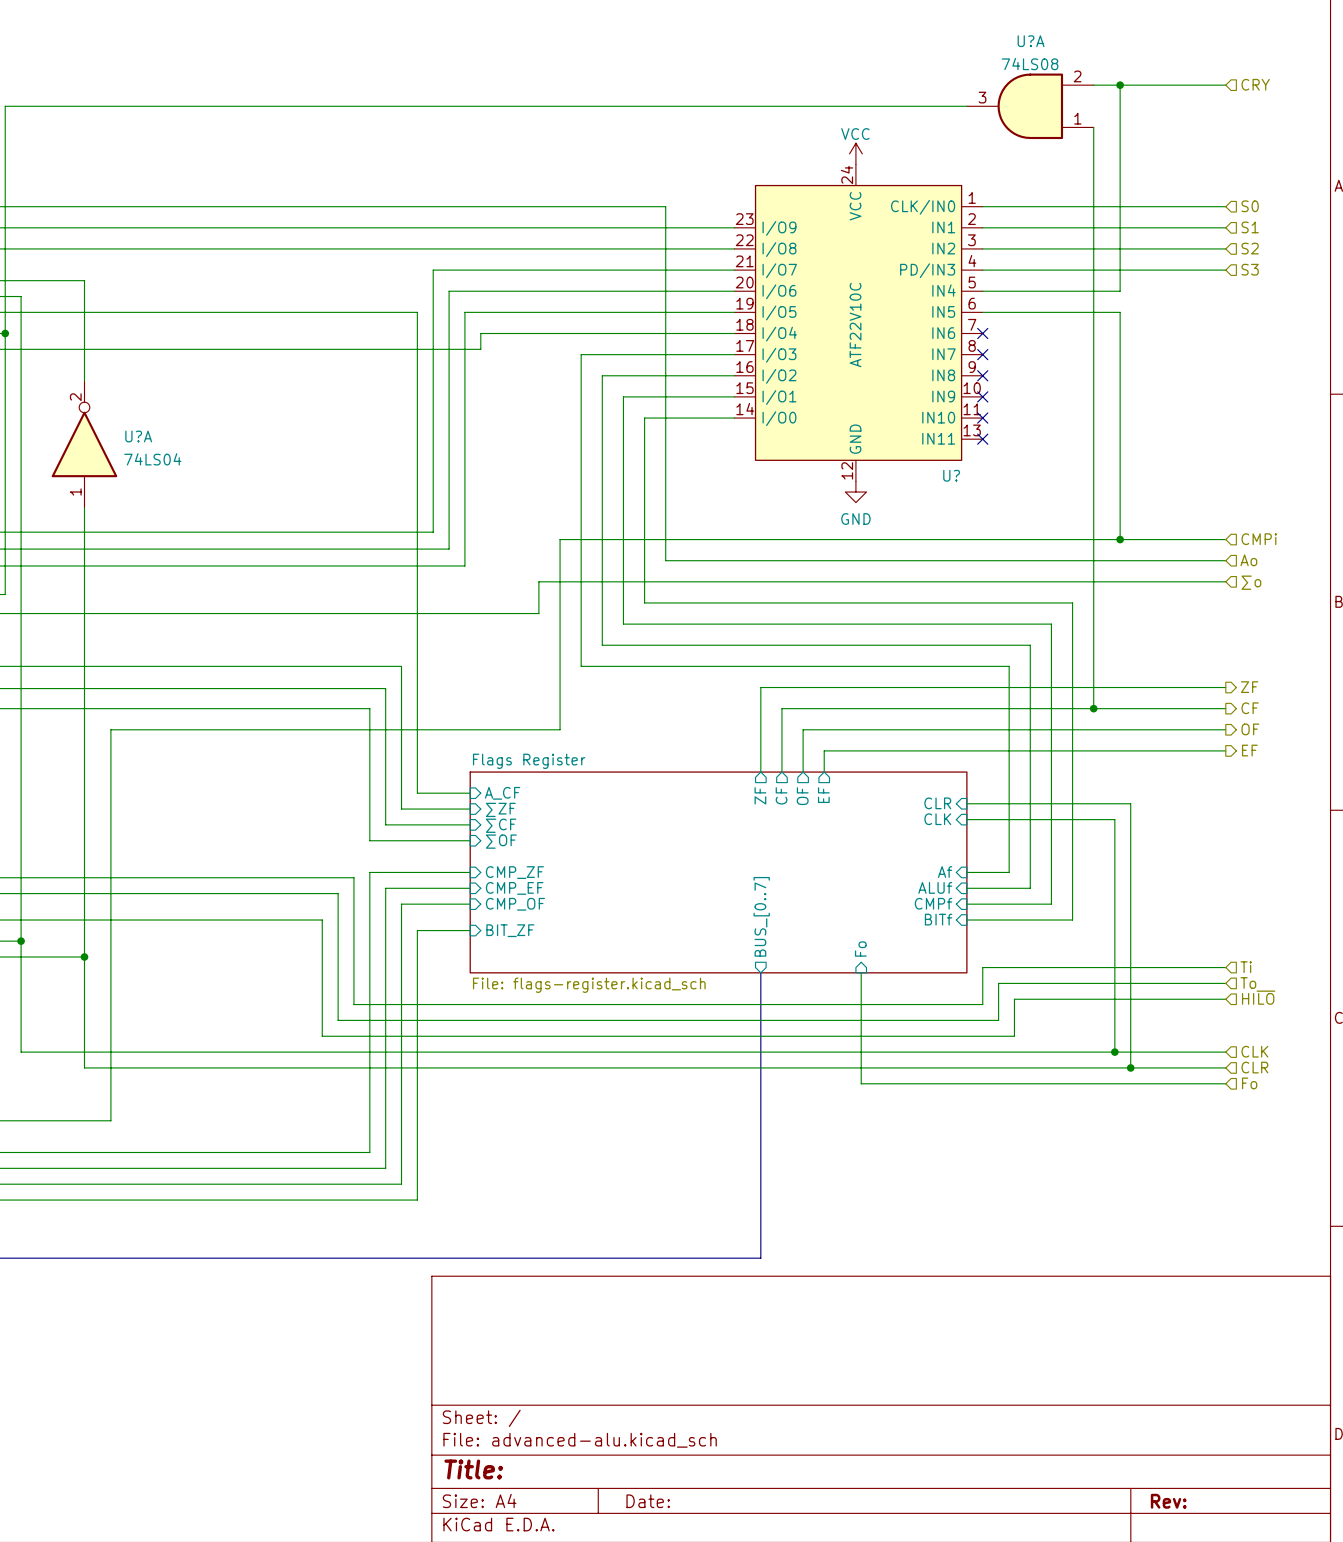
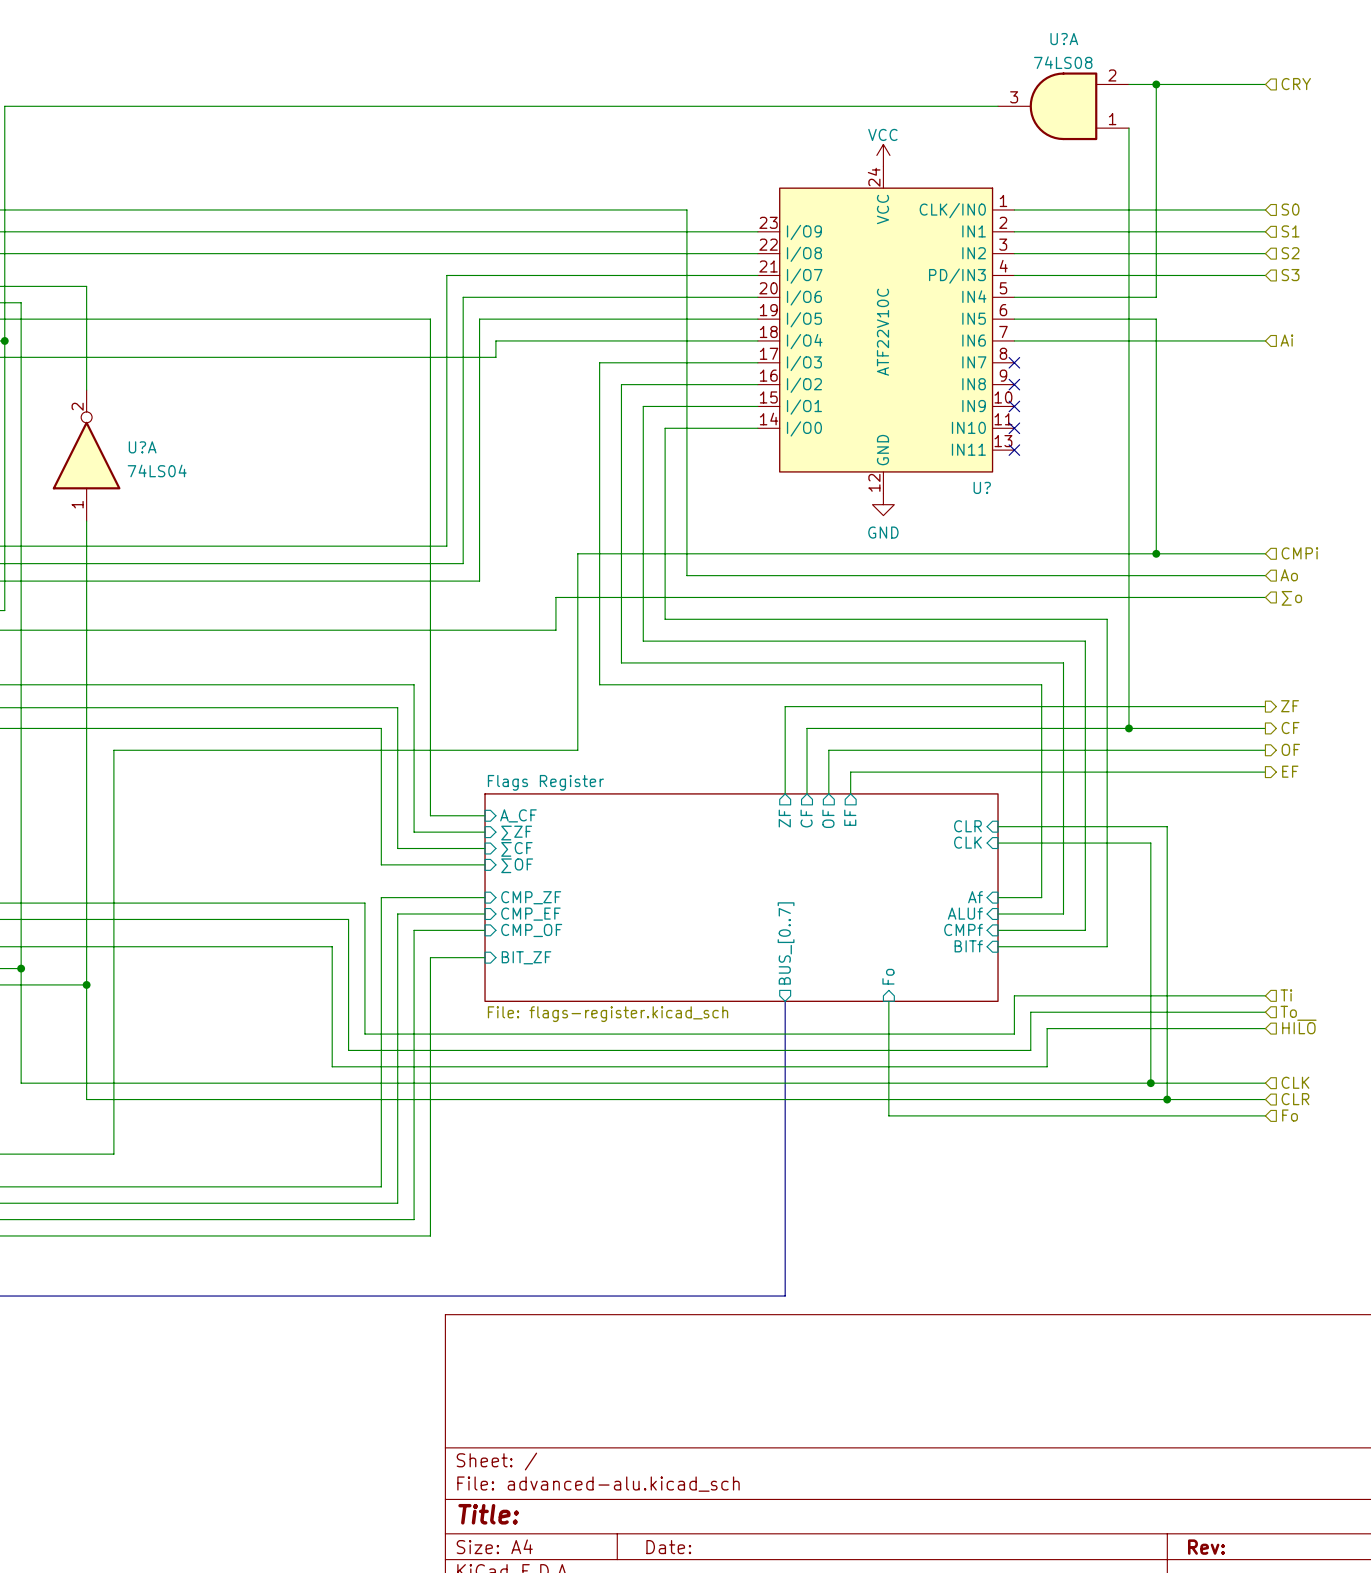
wire: none -> (1014, 340) (1265, 340)
no-connect mark: (982, 333) -> none
hierarchical label: none -> Ai (1286, 340)

